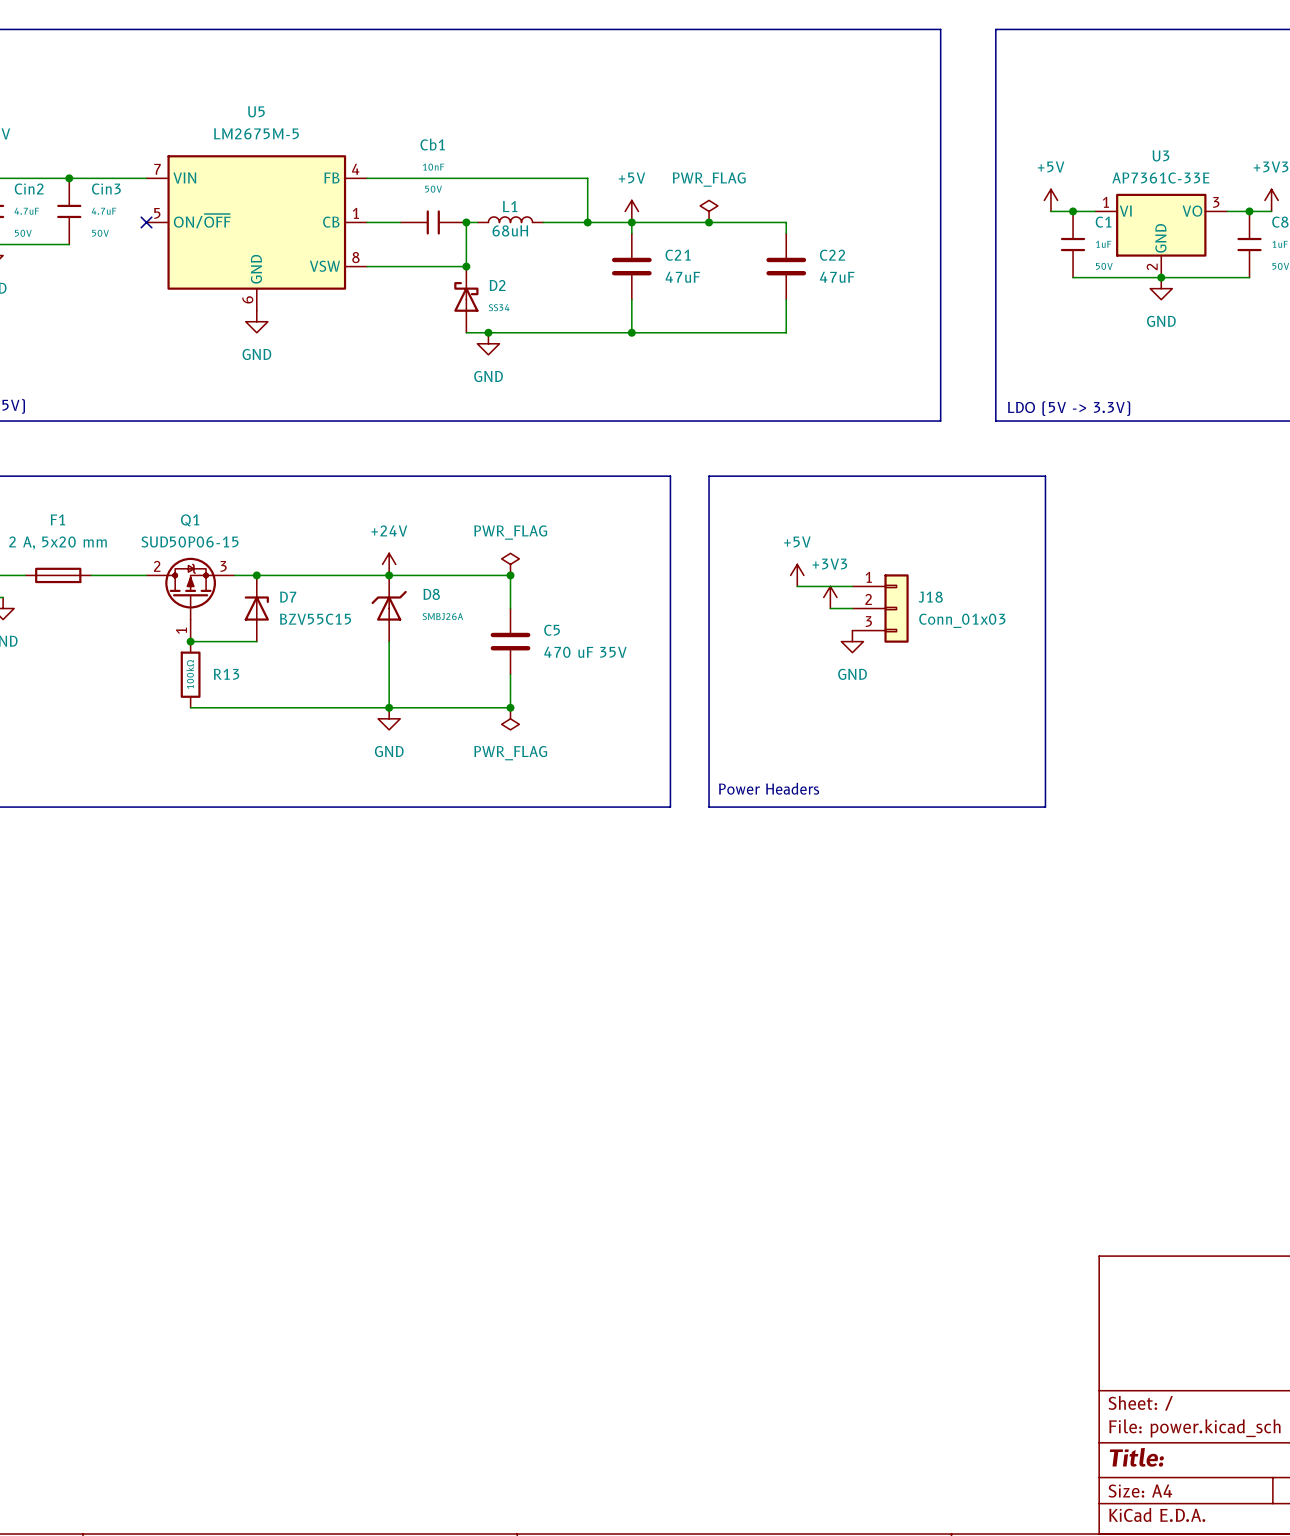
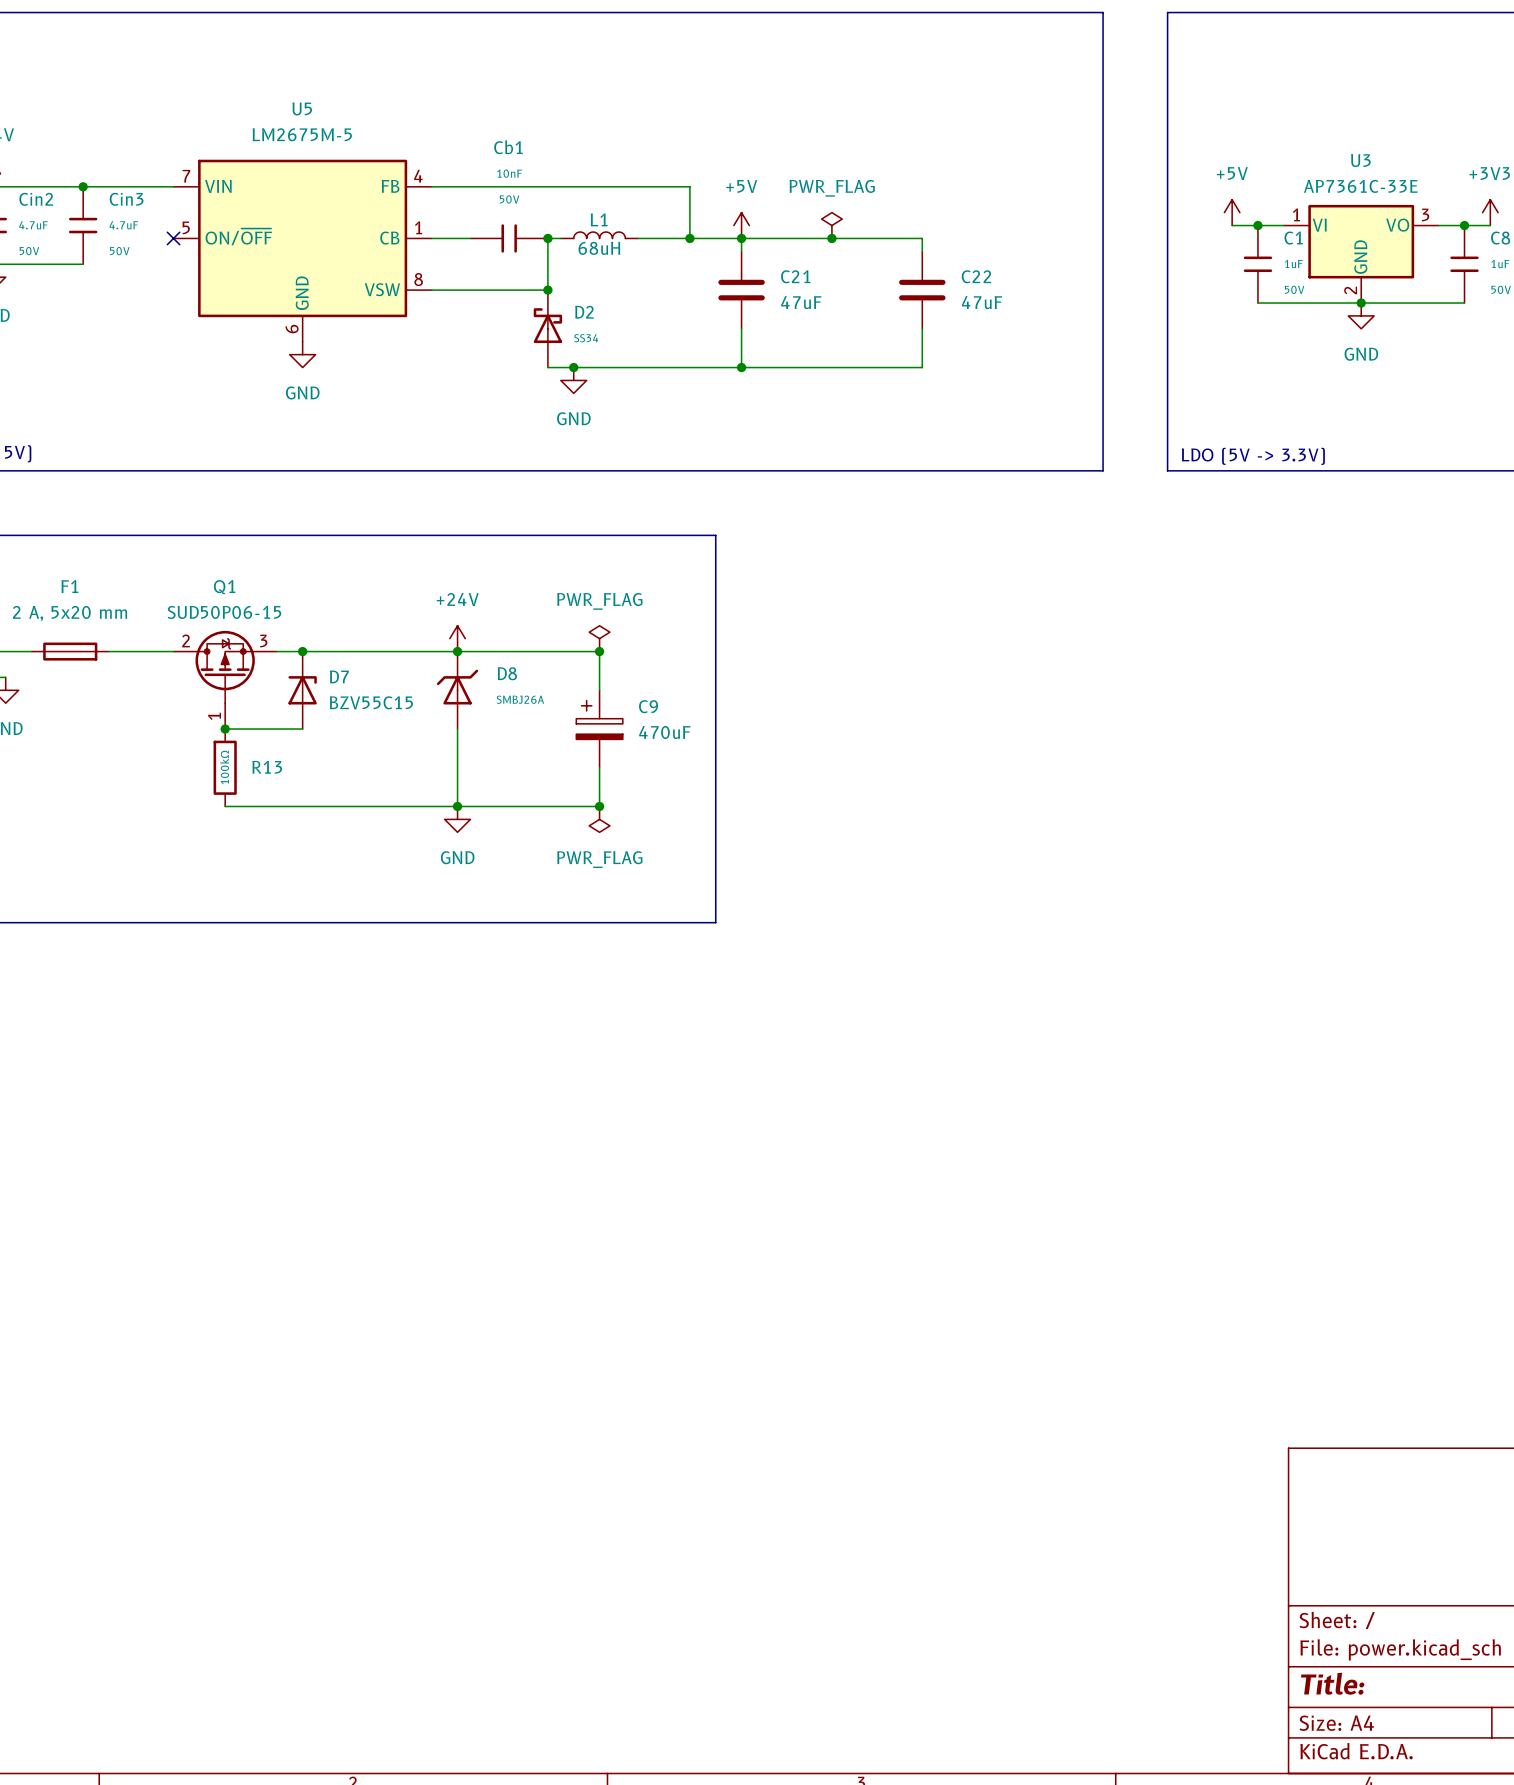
line: (609, 476) (670, 476) (670, 807) (609, 807) -> (715, 535) (715, 922)
line: (709, 476) (1045, 476) (1045, 807) (709, 807) (709, 476) -> none
power symbol: +5V (797, 575) -> none
wire: (797, 586) (852, 586) -> none
power symbol: +3V3 (830, 597) -> none
wire: (830, 608) (852, 608) -> none
J18: Conn_01x03 (880, 608) -> none
C5: 470 uF 35V (510, 641) -> none
C9: none -> 470uF (599, 729)
power symbol: GND (852, 641) -> none
text: Power Headers (769, 788) -> none

